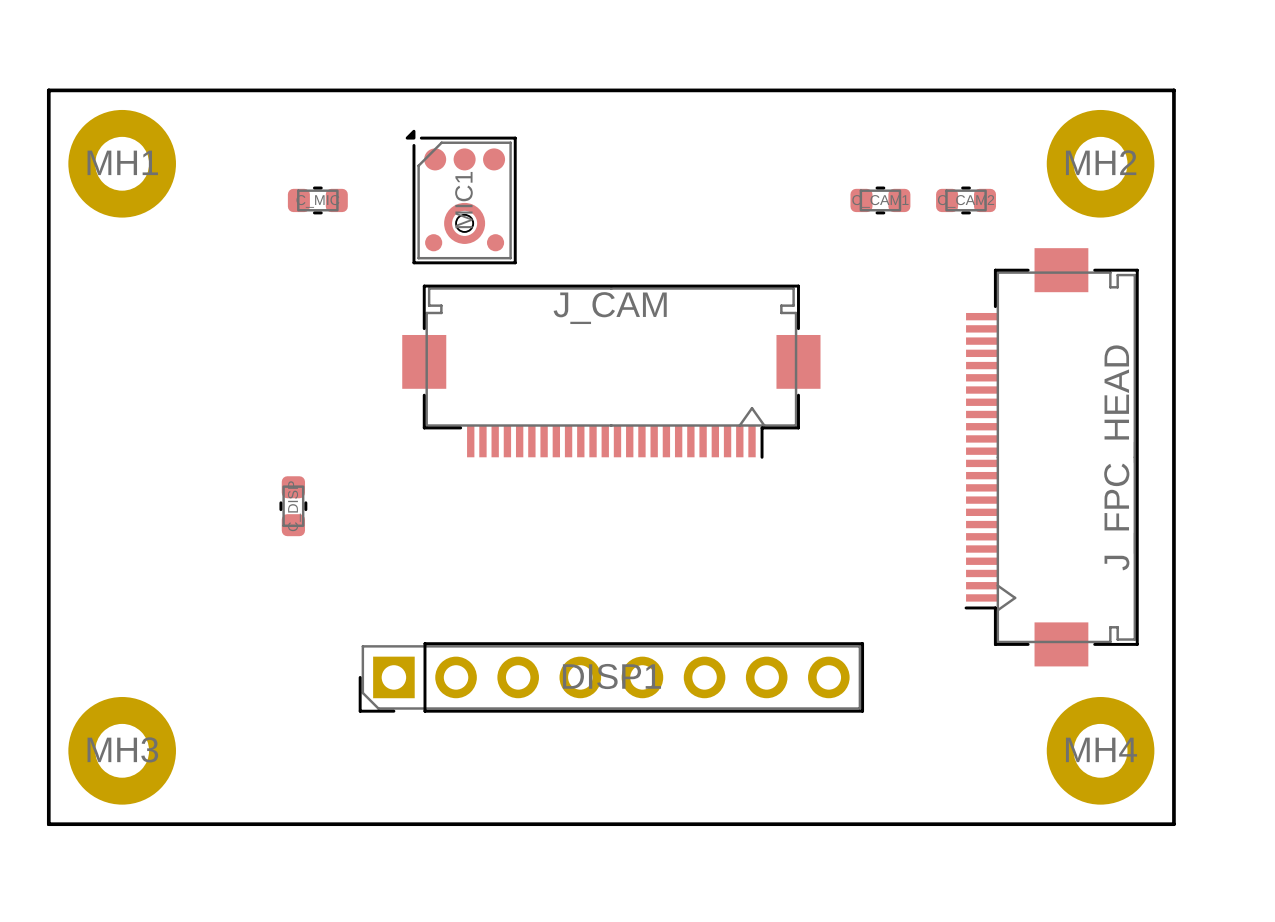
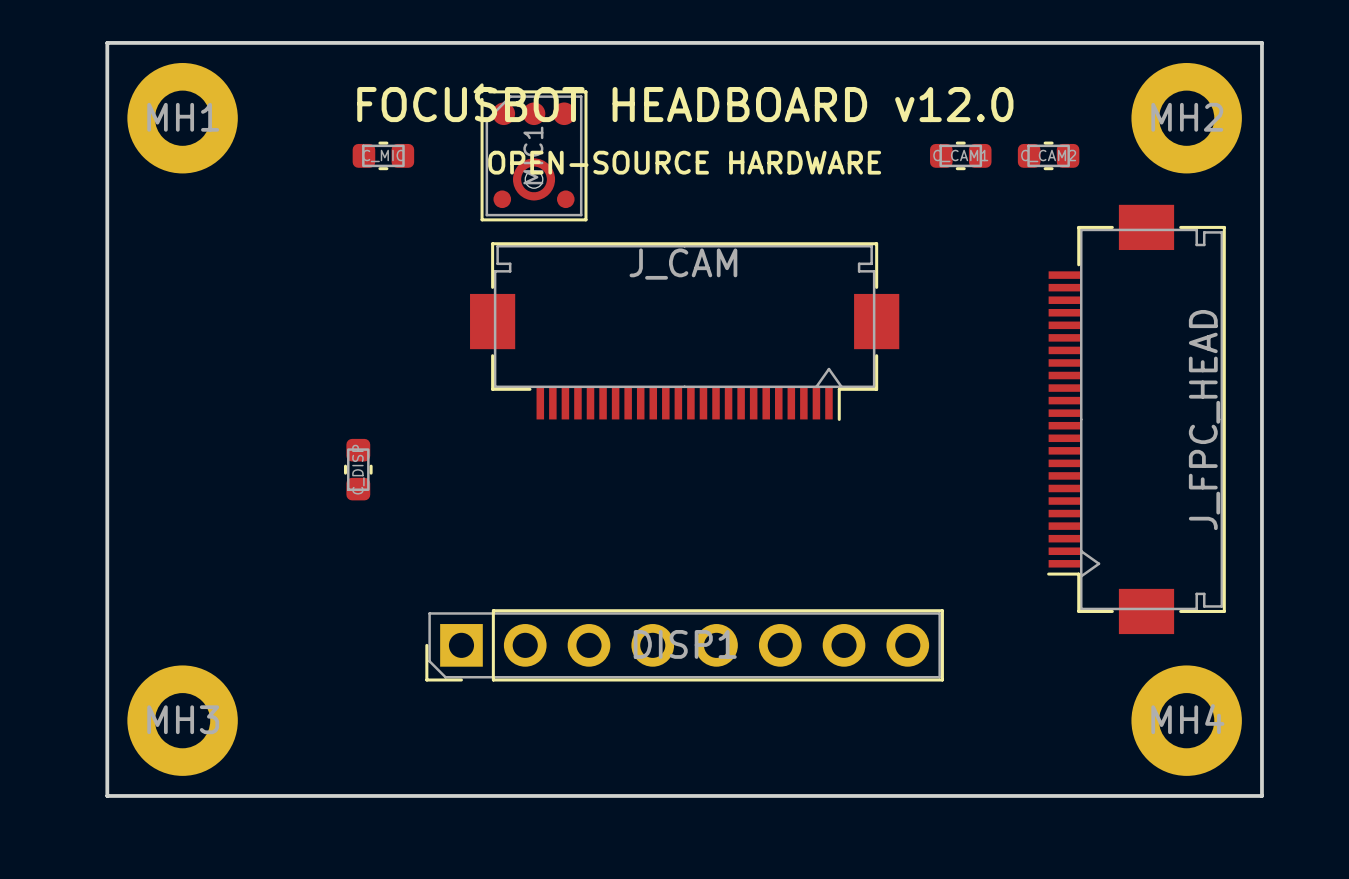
text: none -> FOCUSBOT HEADBOARD v12.0 (685, 104)
text: none -> OPEN-SOURCE HARDWARE (684, 162)

